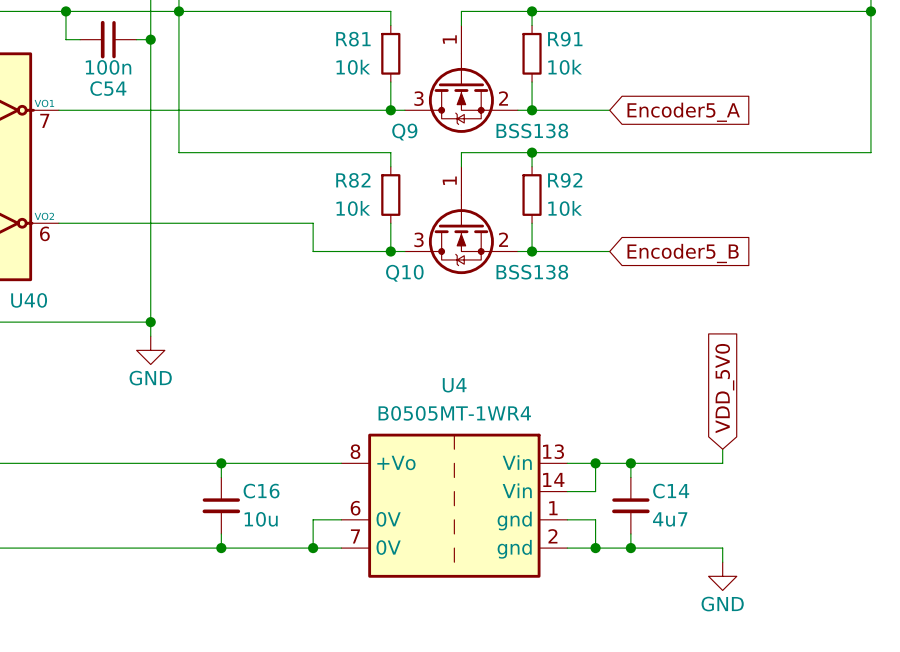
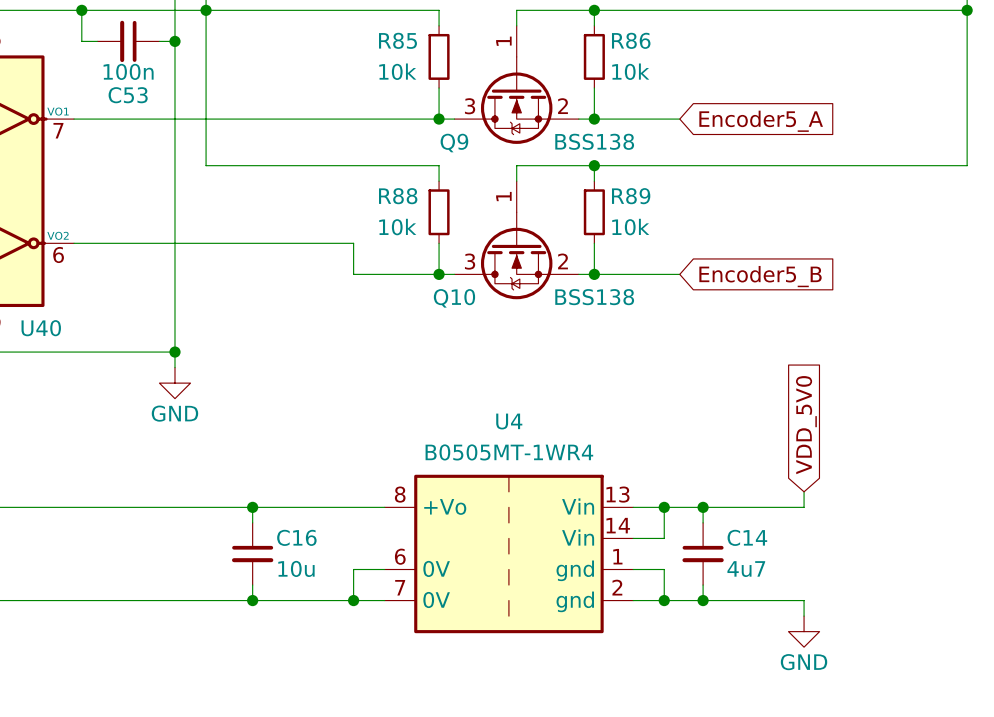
R81 name: R81 (353, 39) -> R85 (397, 40)
R91 name: R91 (565, 39) -> R86 (631, 40)
C54 name: C54 (108, 88) -> C53 (128, 95)
R82 name: R82 (353, 180) -> R88 (398, 196)
R92 name: R92 (565, 180) -> R89 (631, 196)

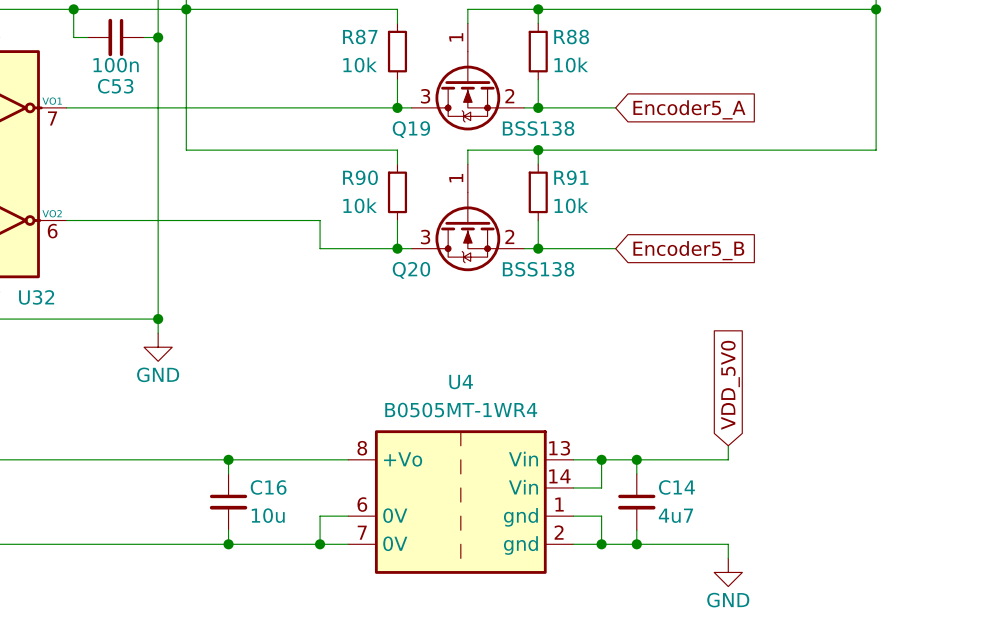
R85 name: R85 (397, 40) -> R87 (360, 36)
R86 name: R86 (631, 40) -> R88 (571, 36)
Q9 name: Q9 (454, 143) -> Q19 (411, 129)
R88 name: R88 (398, 196) -> R90 (360, 177)
R89 name: R89 (631, 196) -> R91 (571, 177)
Q10 name: Q10 (454, 298) -> Q20 (411, 270)
U40 name: U40 (41, 328) -> U32 (36, 297)

